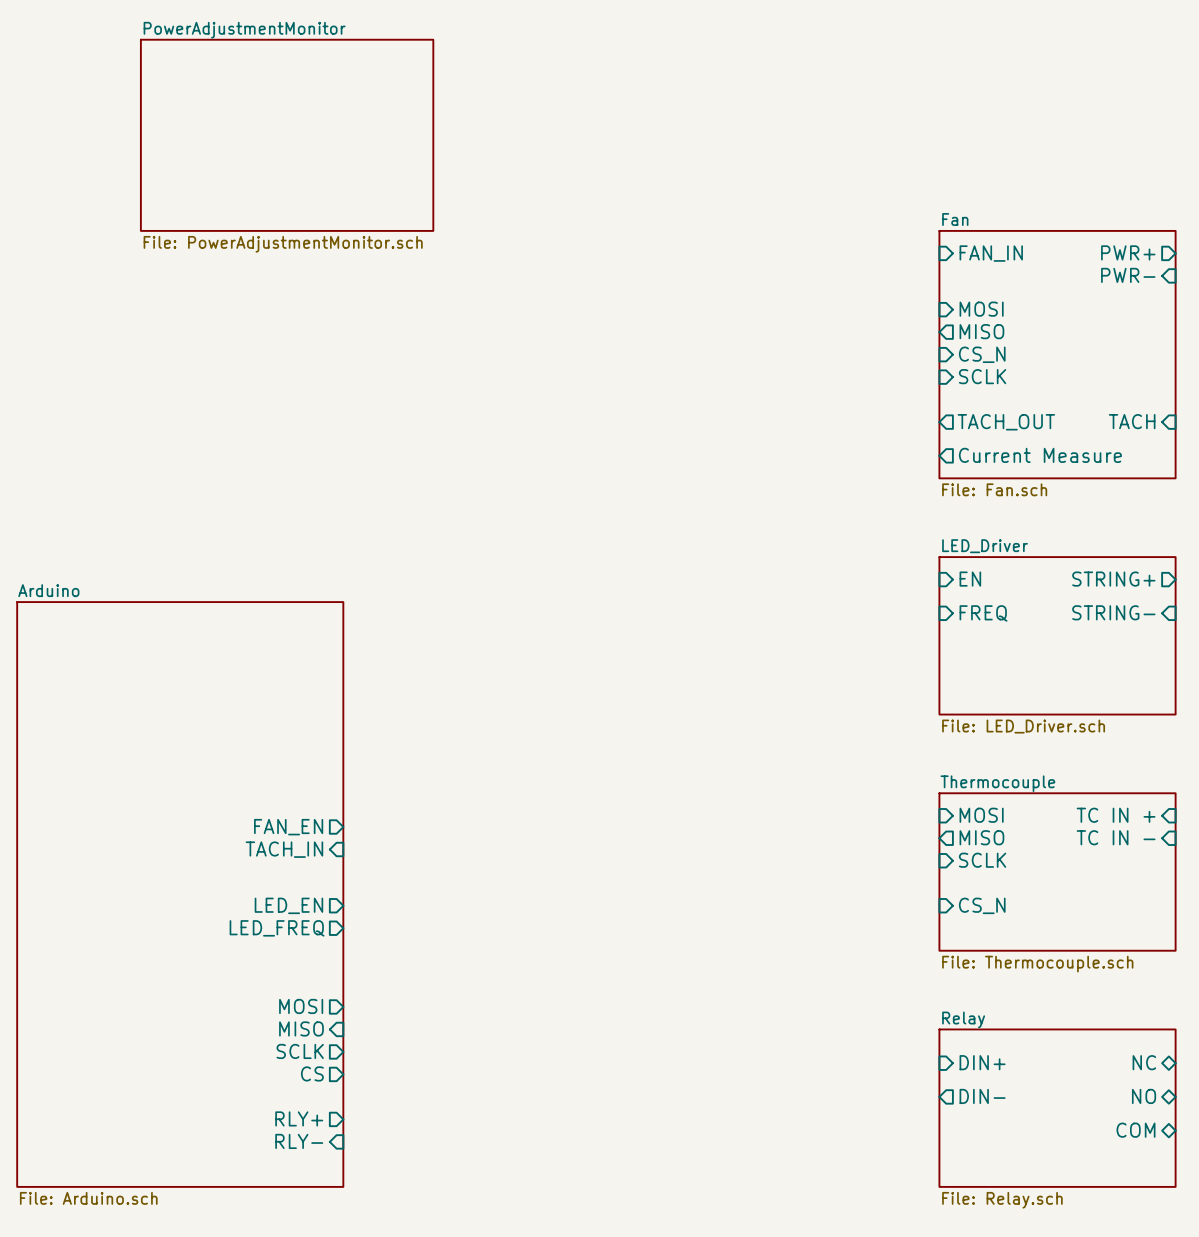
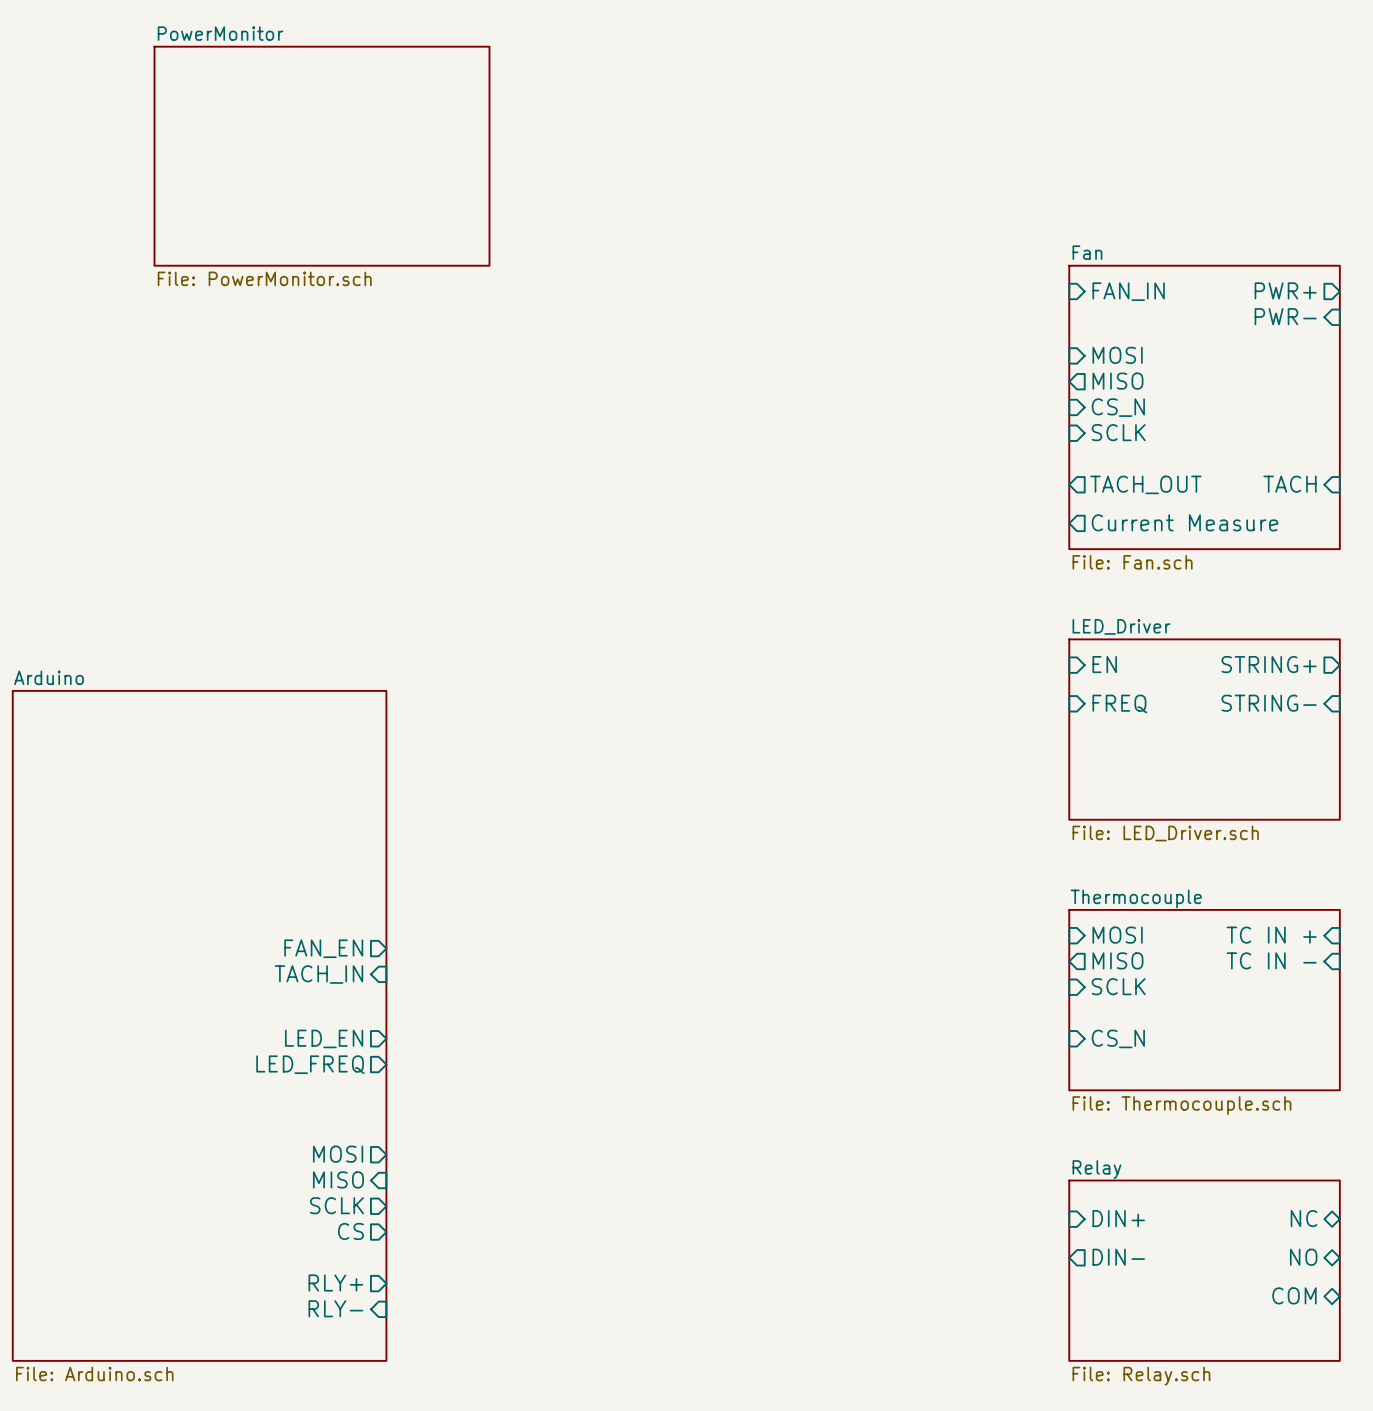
sheet PowerAdjustmentMonitor name: PowerAdjustmentMonitor (244, 30) -> PowerMonitor (220, 33)
sheet PowerAdjustmentMonitor value: File: PowerAdjustmentMonitor.sch (283, 244) -> File: PowerMonitor.sch (264, 278)

